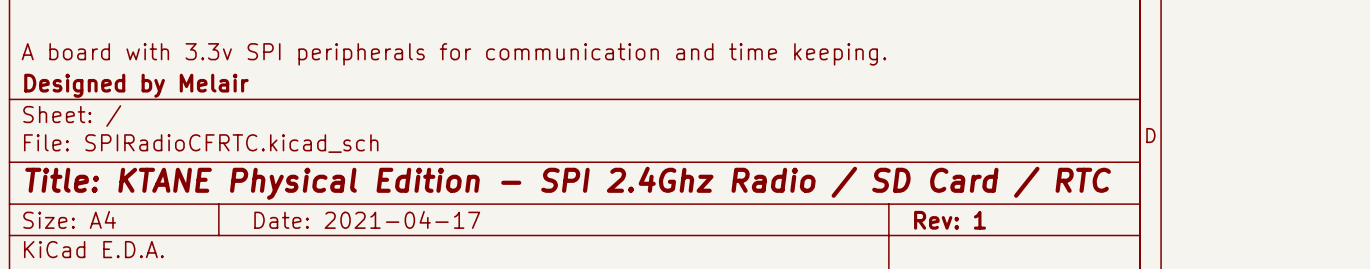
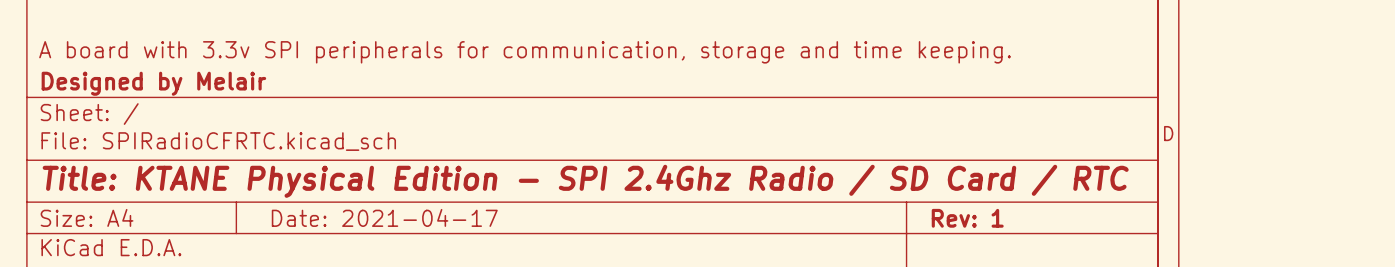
title block: A board with 3.3v SPI peripherals for communication and time keeping. (453, 54) -> A board with 3.3v SPI peripherals for communication, storage and time keeping. (525, 52)

